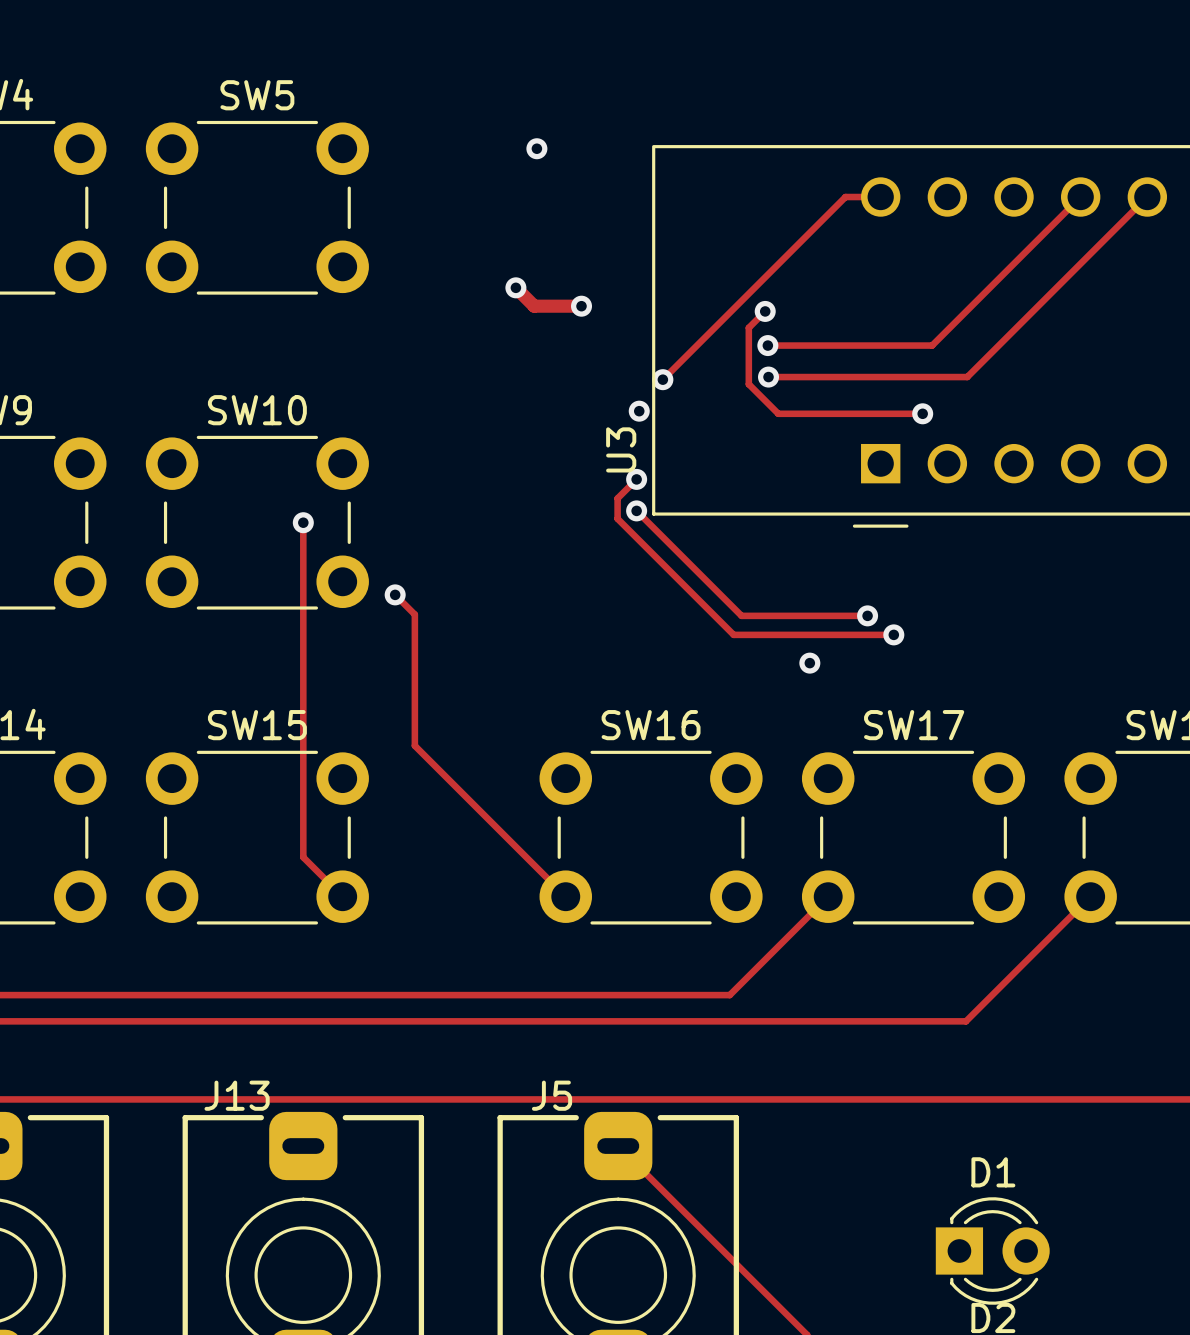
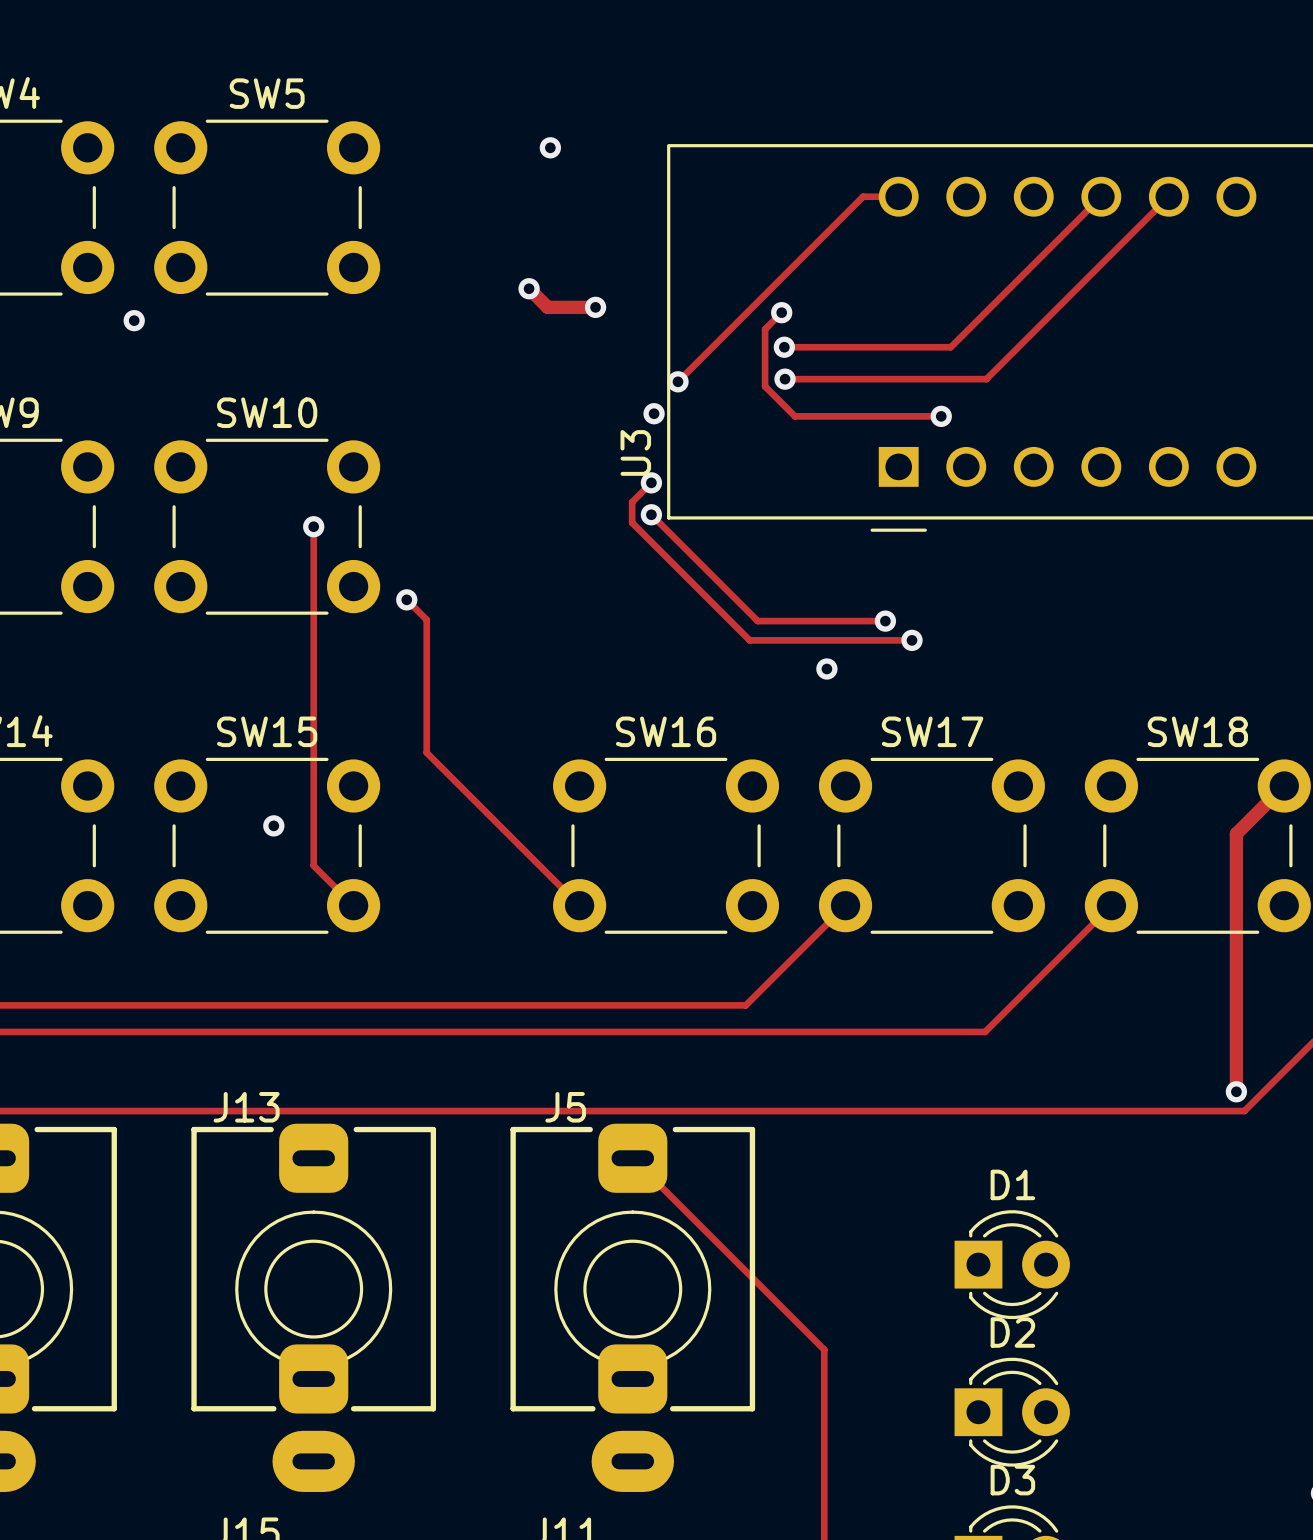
via: none -> (134, 320)
via: none -> (273, 825)

